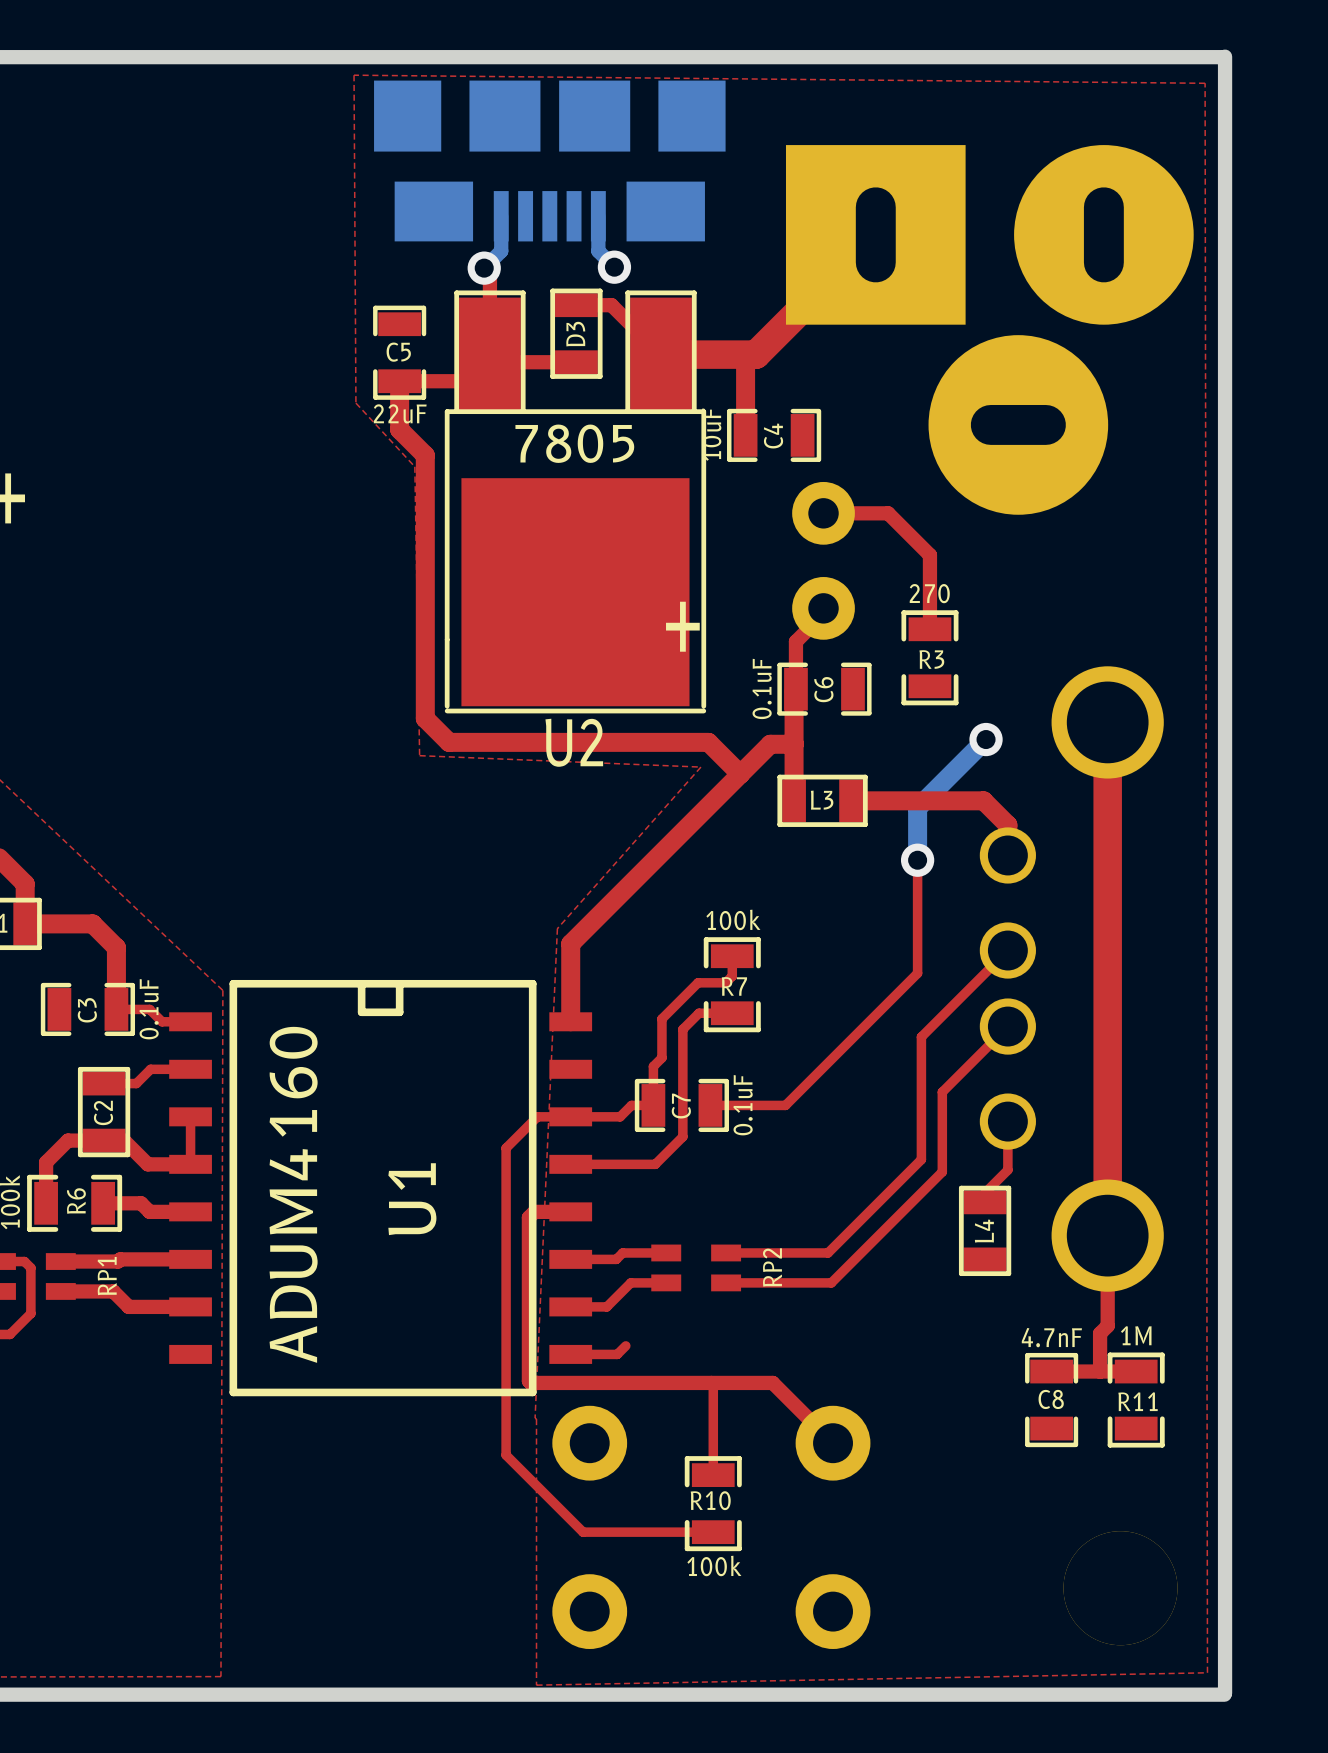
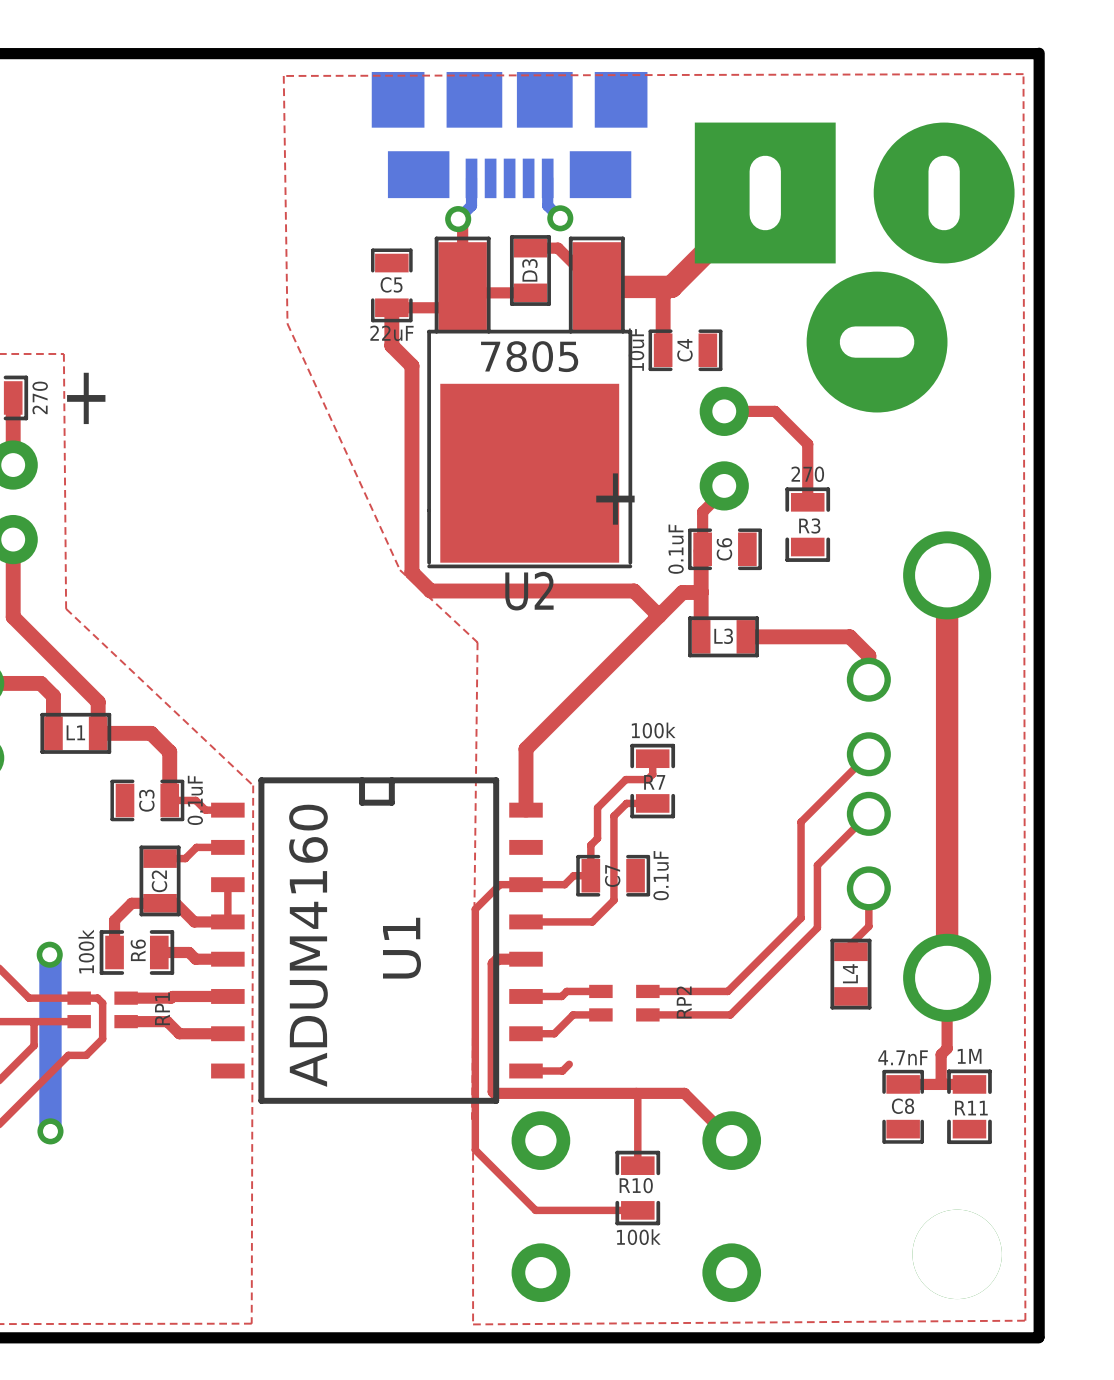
top zone outline: (1205, 83) (354, 75) (355, 403) (414, 466) (419, 755) (700, 767) (557, 928) (535, 1418) (536, 1685) (1207, 1672) -> (1023, 74) (283, 75) (287, 323) (400, 570) (477, 642) (471, 1119) (473, 1115) (473, 1324) (1025, 1320)
bottom track: (986, 739) (917, 807) (917, 860) -> none
via: (986, 739) -> none
top track: (917, 860) (917, 973) (785, 1105) (710, 1105) -> none
via: (917, 860) -> none

